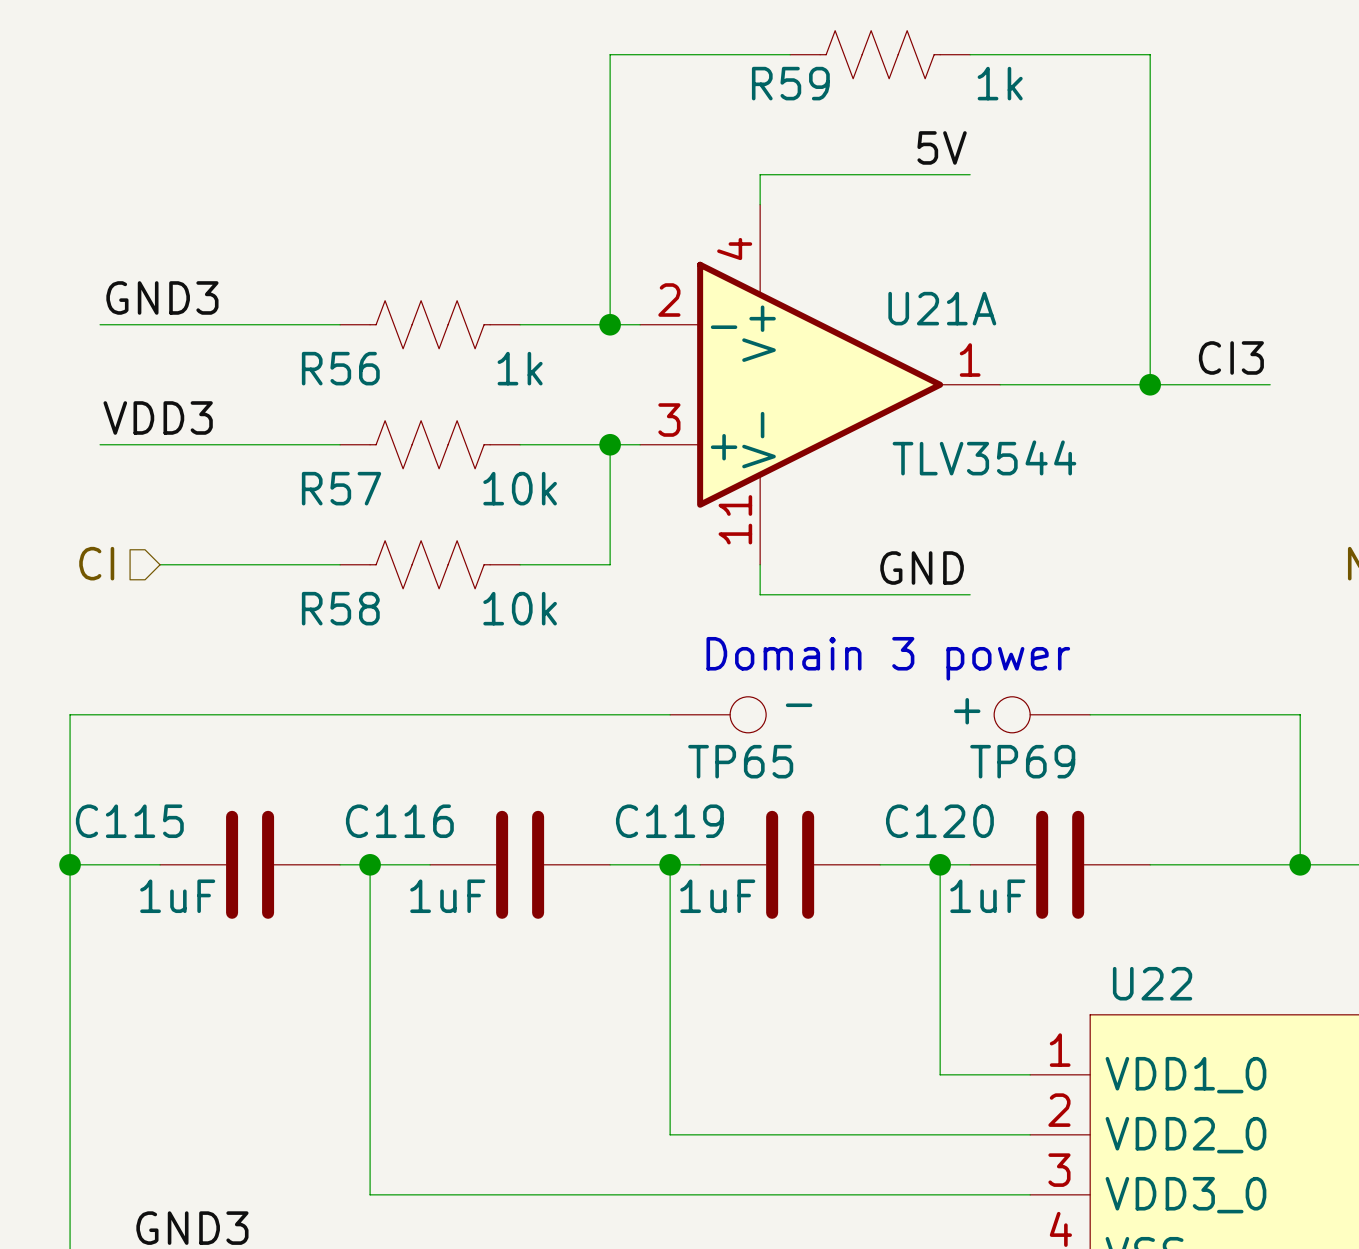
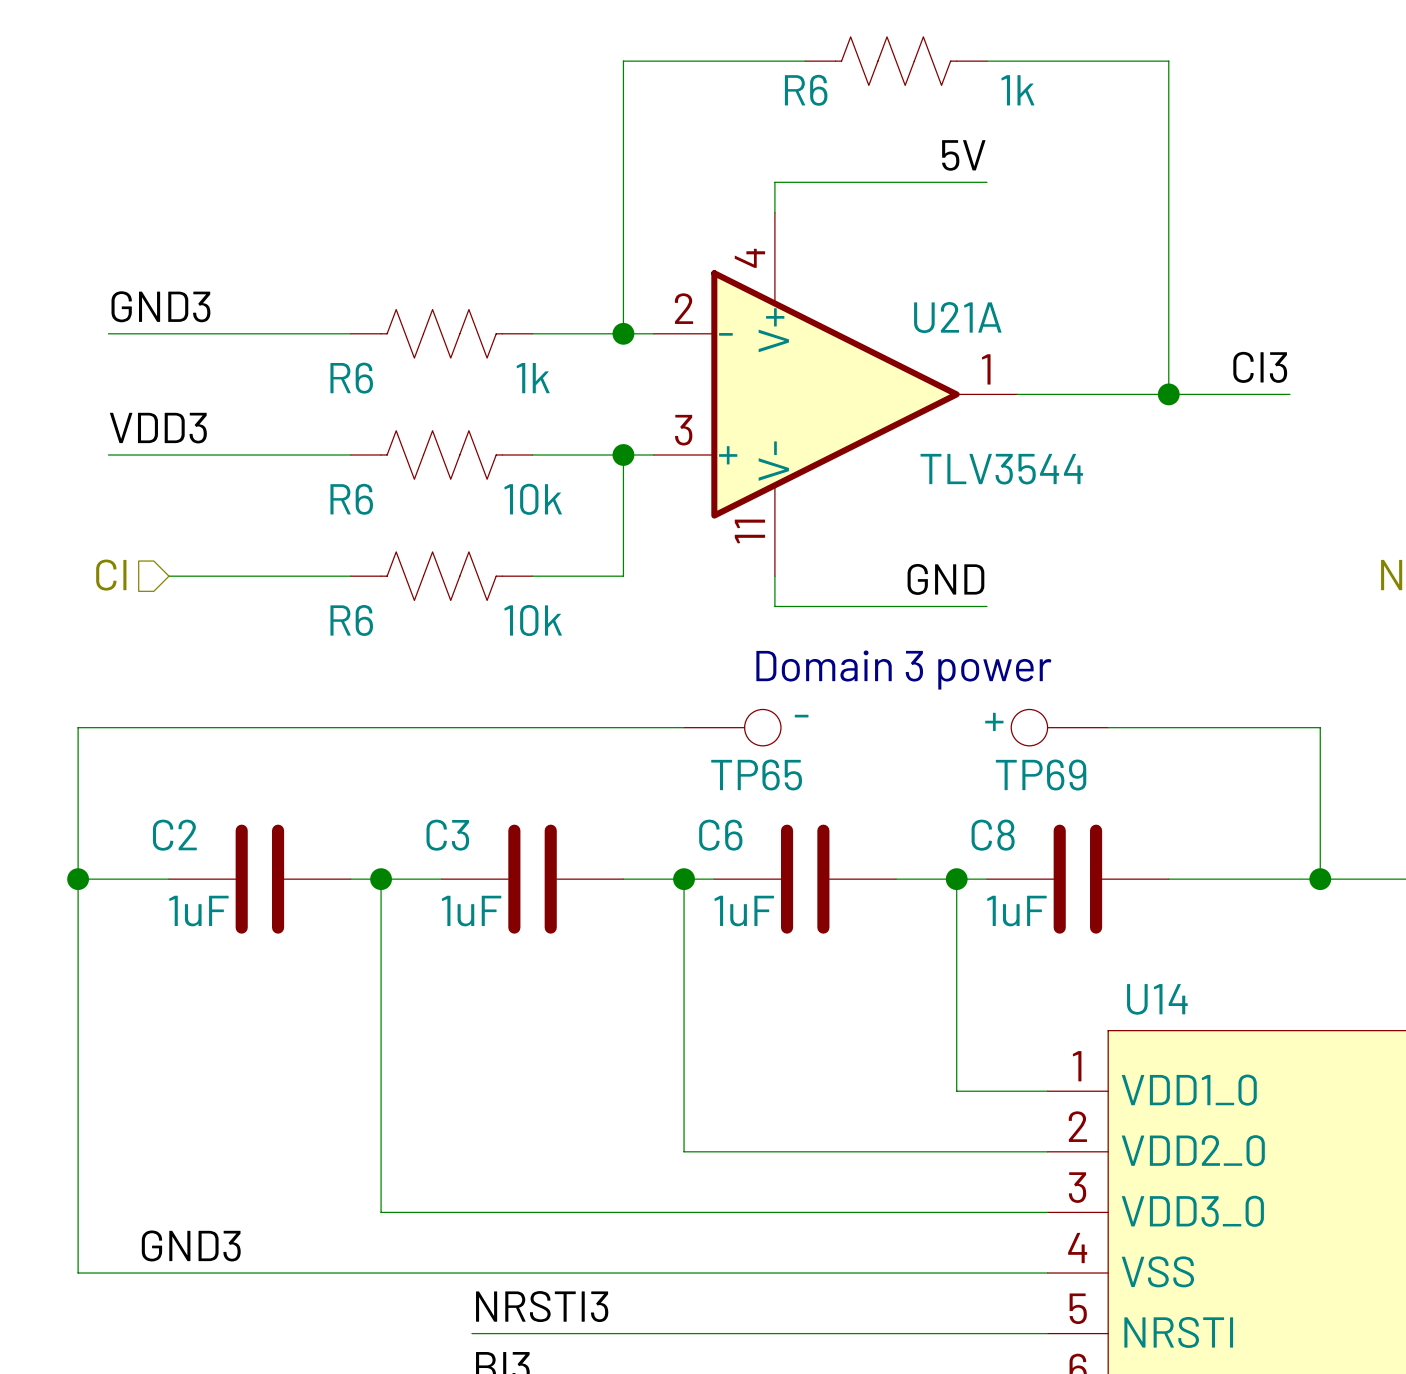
R59 name: R59 (790, 83) -> R6 (806, 90)
R56 name: R56 (340, 368) -> R6 (351, 378)
R57 name: R57 (341, 488) -> R6 (351, 499)
R58 name: R58 (340, 608) -> R6 (351, 620)
C115 name: C115 (129, 821) -> C2 (174, 835)
C116 name: C116 (399, 821) -> C3 (447, 835)
C119 name: C119 (669, 821) -> C6 (720, 835)
C120 name: C120 (939, 821) -> C8 (993, 835)
U22 name: U22 (1152, 983) -> U14 (1157, 999)

